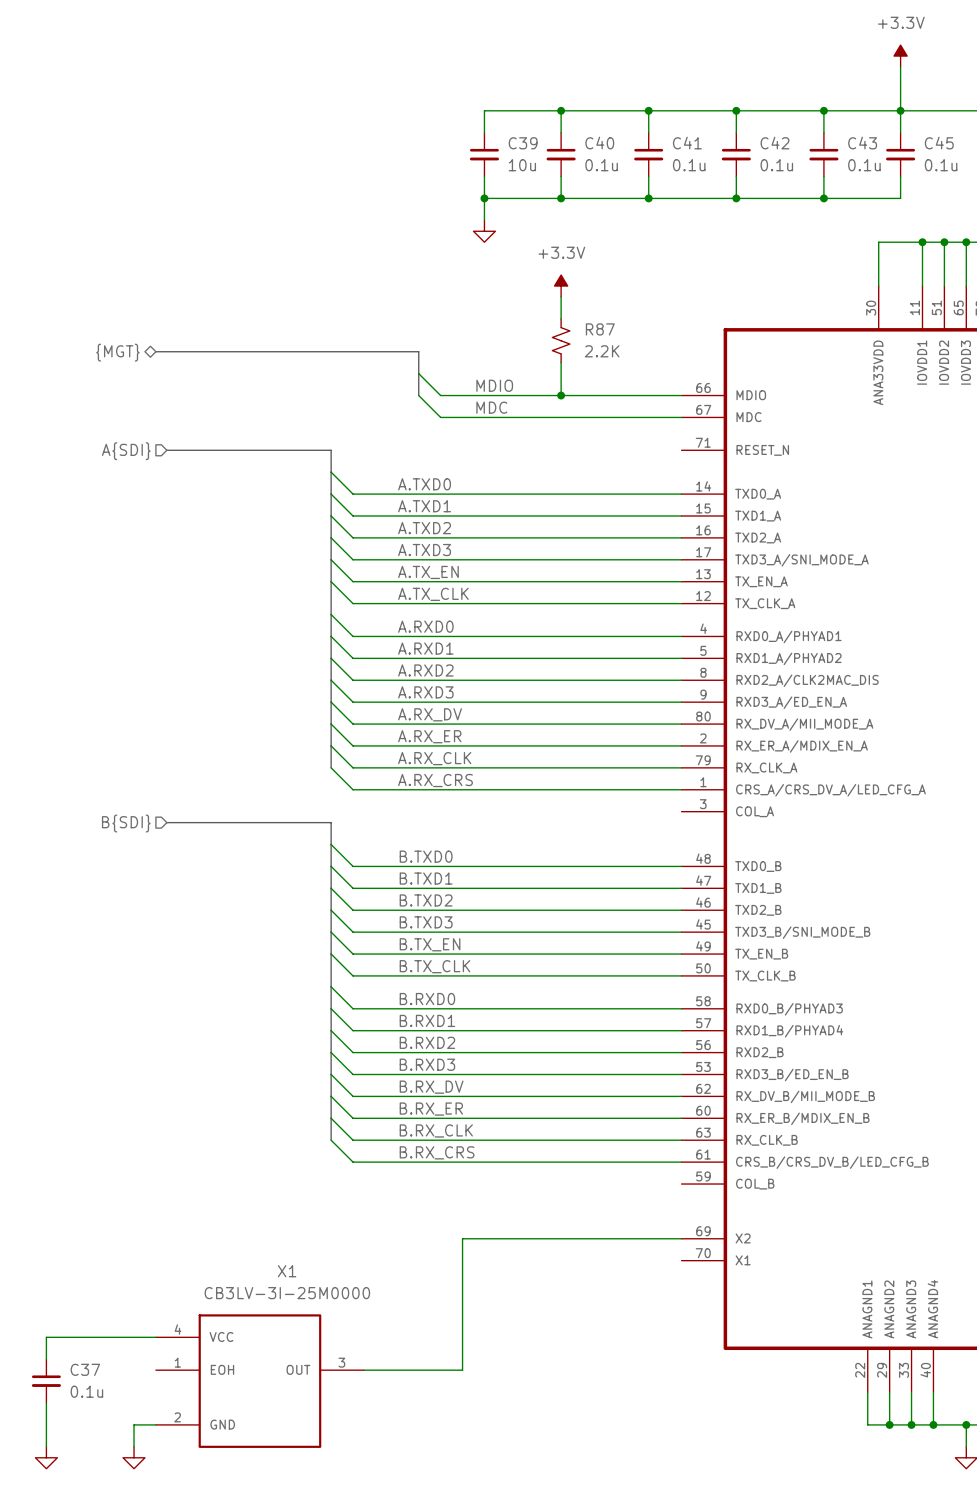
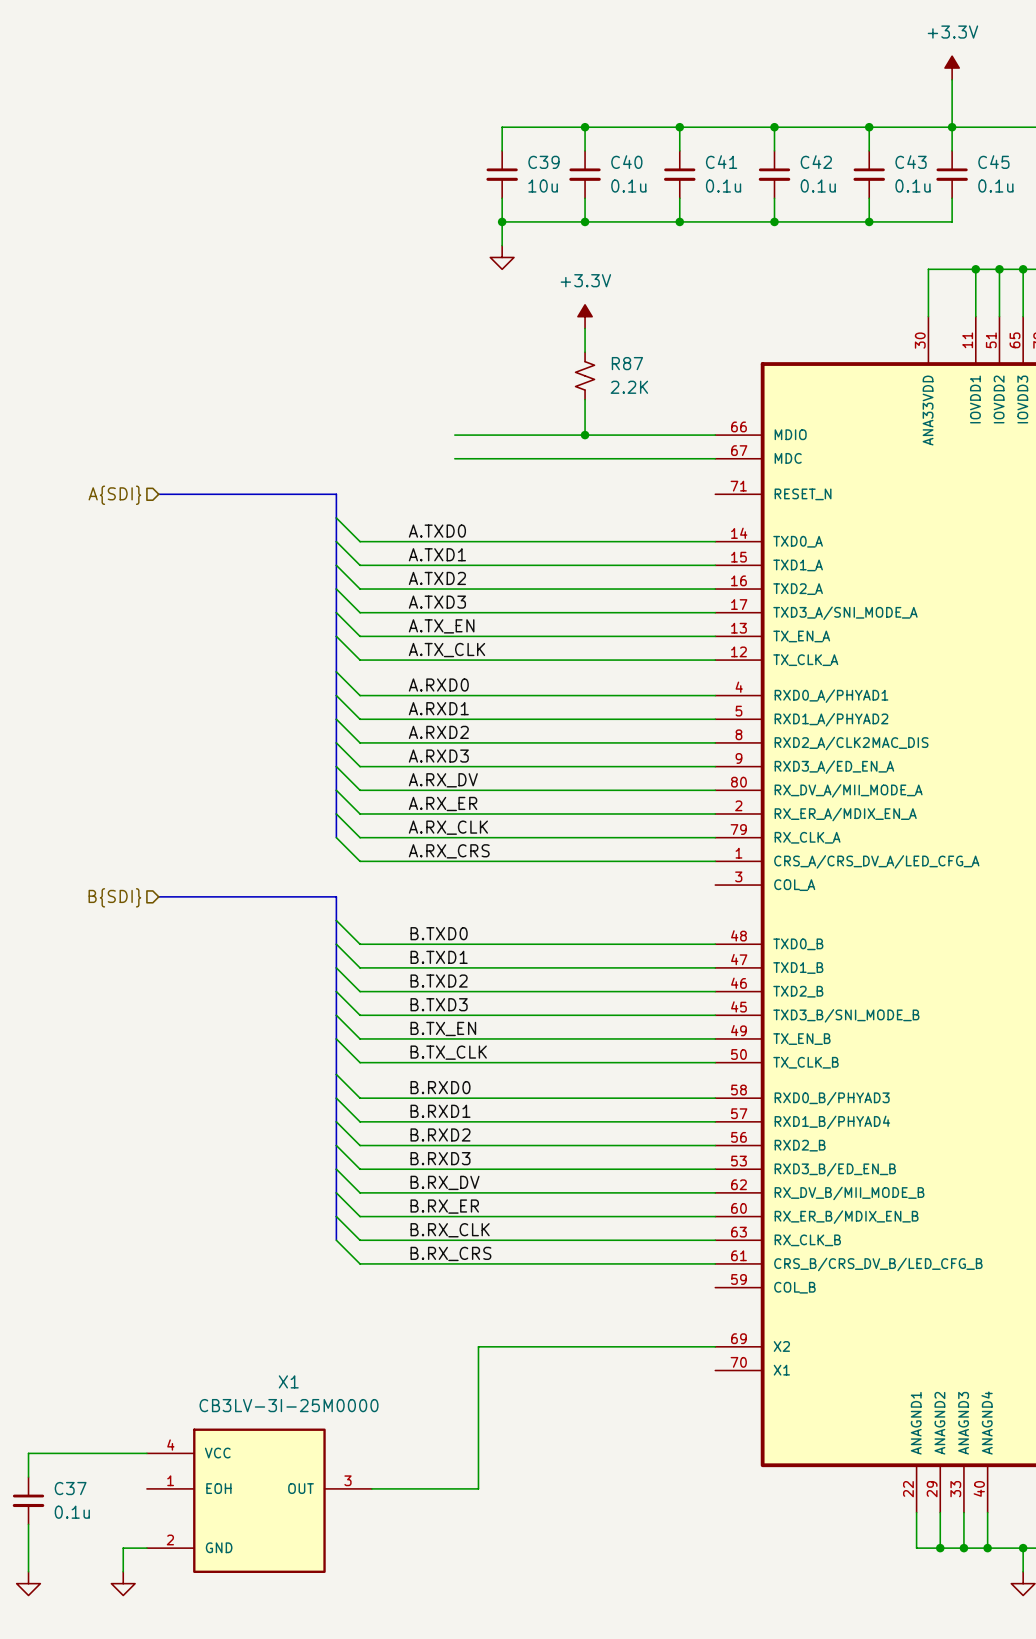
bus: (155, 351) (418, 351) (418, 395) -> none
hierarchical label: {MGT} (117, 352) -> none
wire: (418, 373) (440, 395) -> none
label: MDIO (494, 385) -> none
wire: (418, 395) (440, 417) -> none
label: MDC (491, 407) -> none

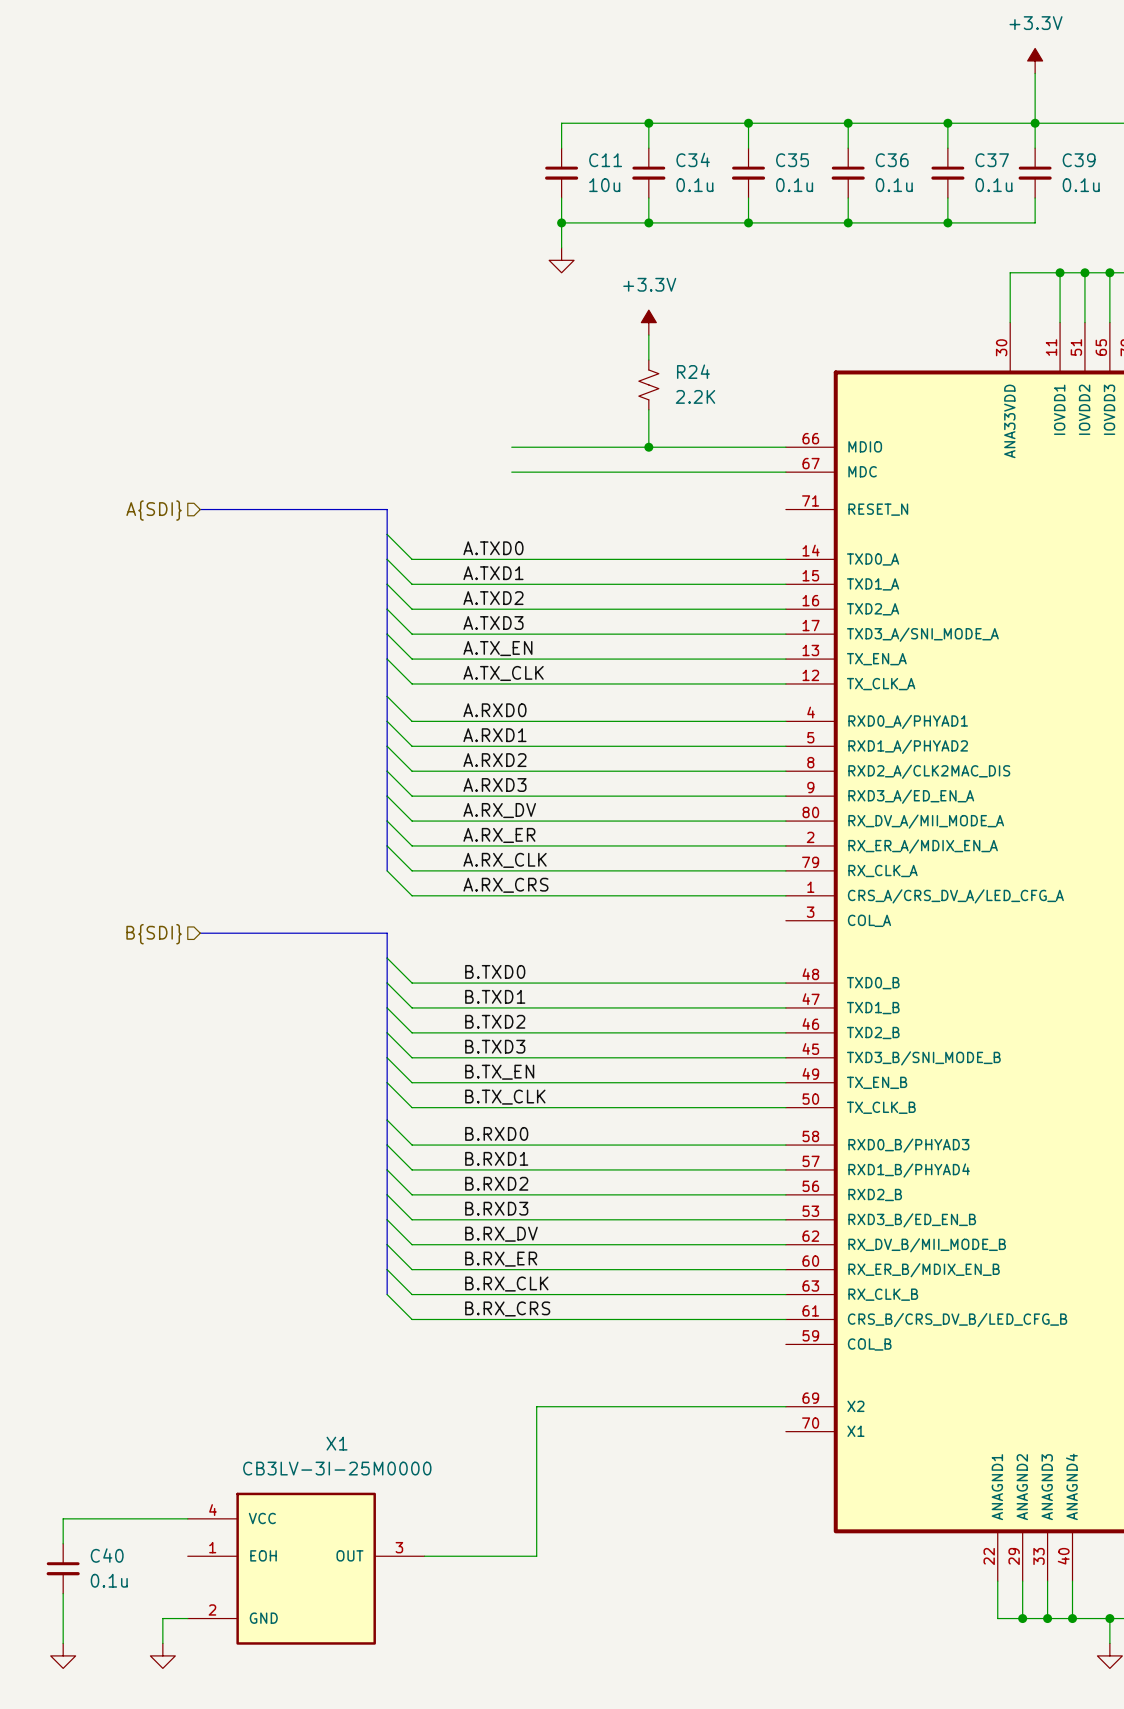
C39 name: C39 (543, 162) -> C11 (605, 160)
C40 name: C40 (626, 162) -> C34 (693, 159)
C41 name: C41 (721, 162) -> C35 (792, 160)
C42 name: C42 (816, 162) -> C36 (892, 160)
C43 name: C43 (911, 162) -> C37 (992, 160)
C45 name: C45 (993, 162) -> C39 (1079, 160)
R87 name: R87 (627, 363) -> R24 (693, 371)
C37 name: C37 (70, 1488) -> C40 (107, 1555)

